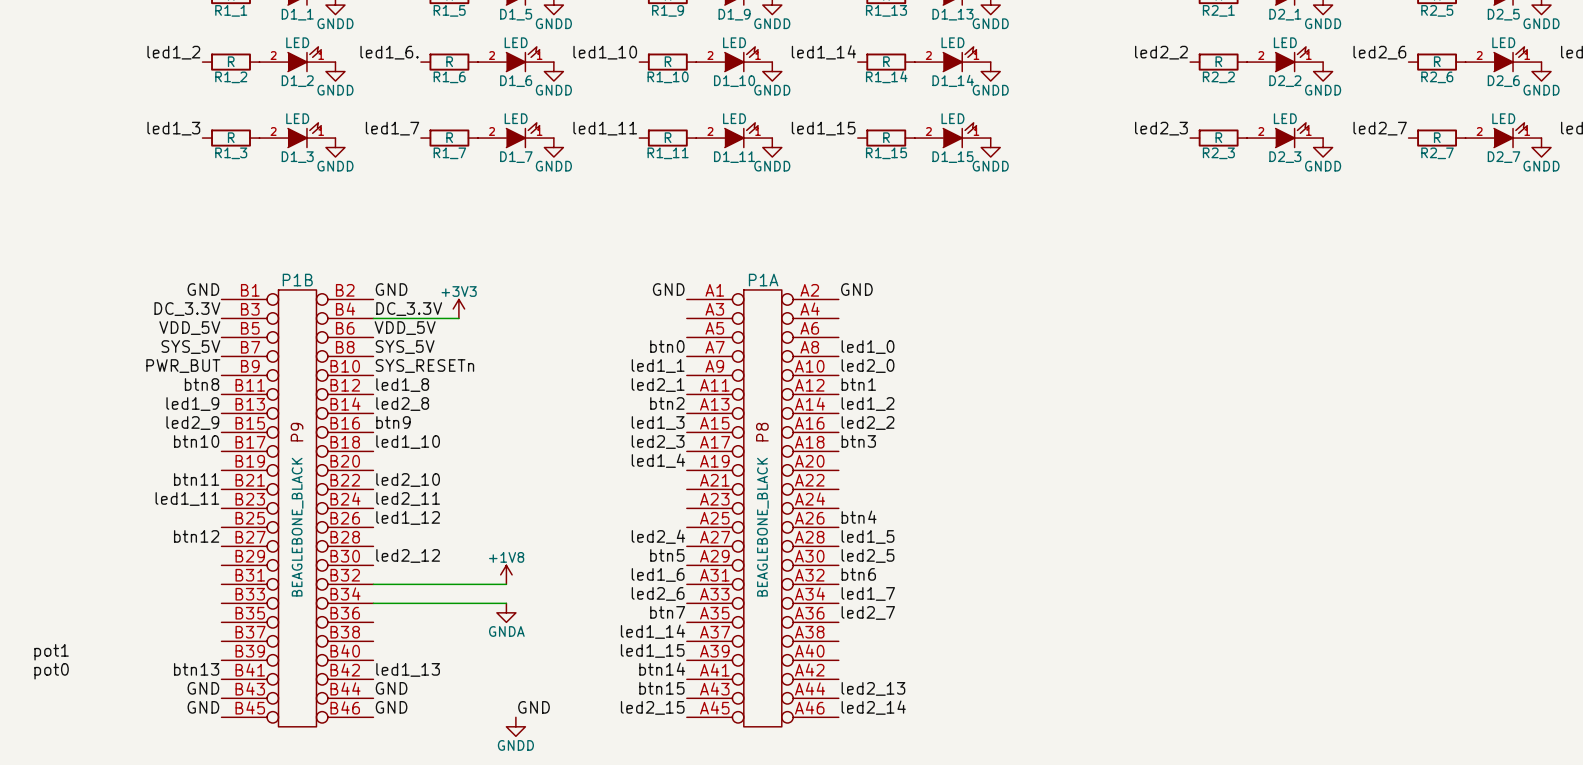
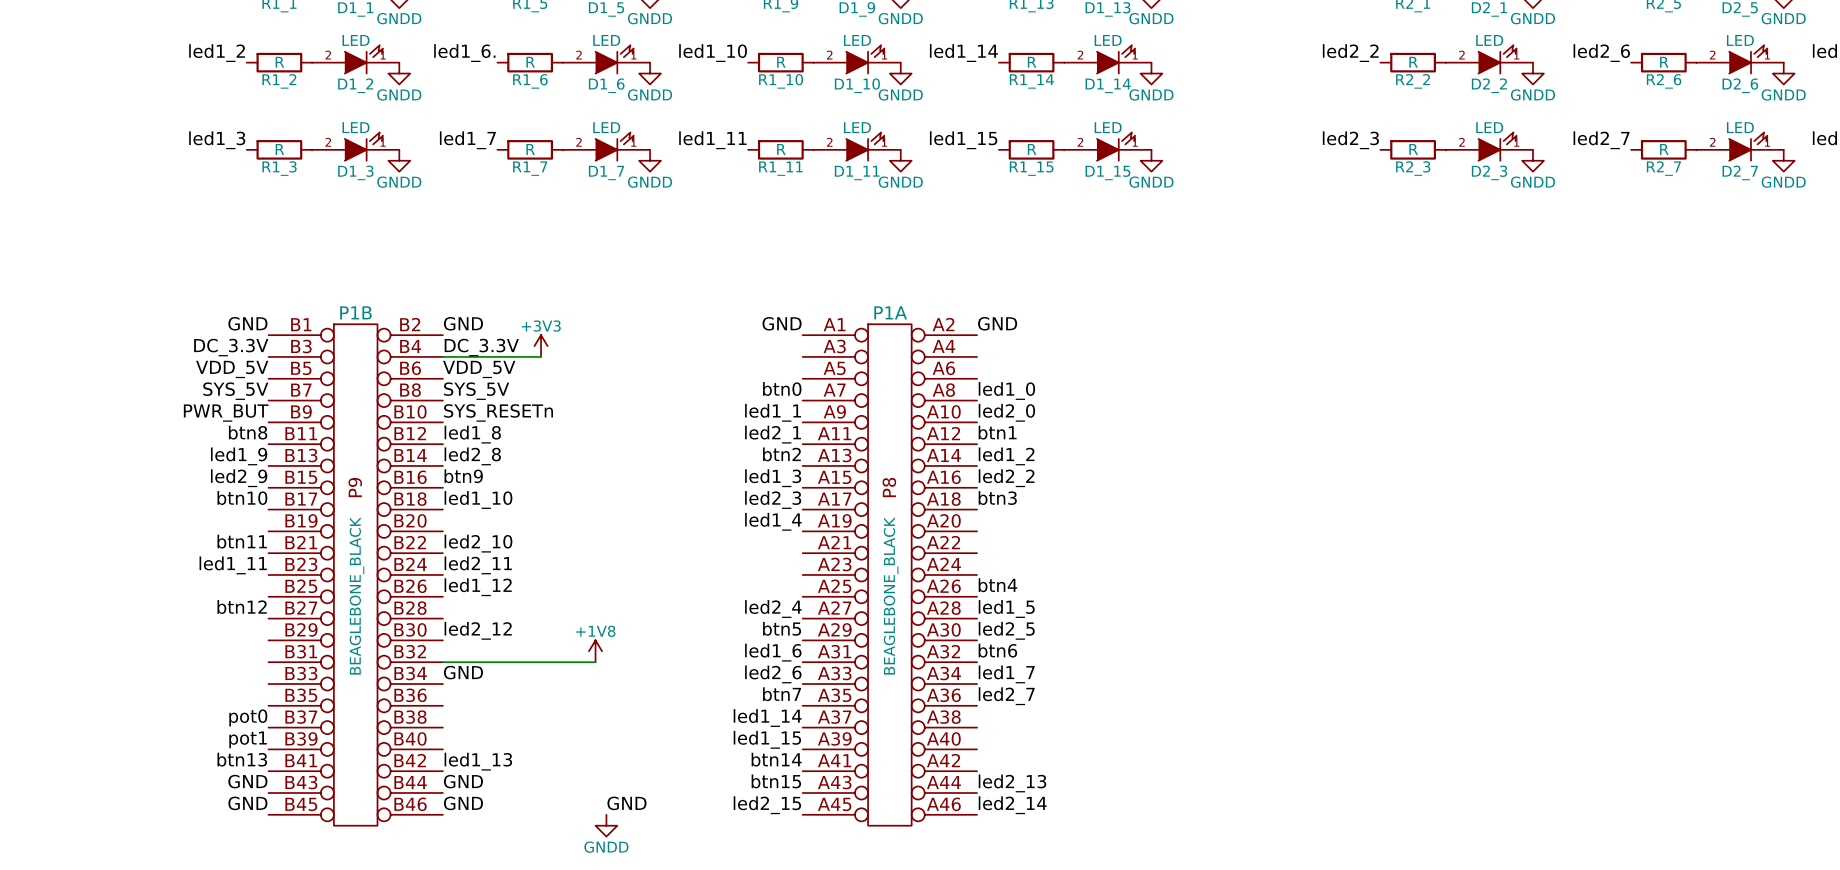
label: none -> GND (463, 672)
wire: (373, 603) (506, 603) -> none
power symbol: GNDA (506, 612) -> none
label: none -> pot0 (248, 717)
label: pot1 (51, 652) -> none
label: none -> pot1 (248, 739)
label: pot0 (51, 671) -> none

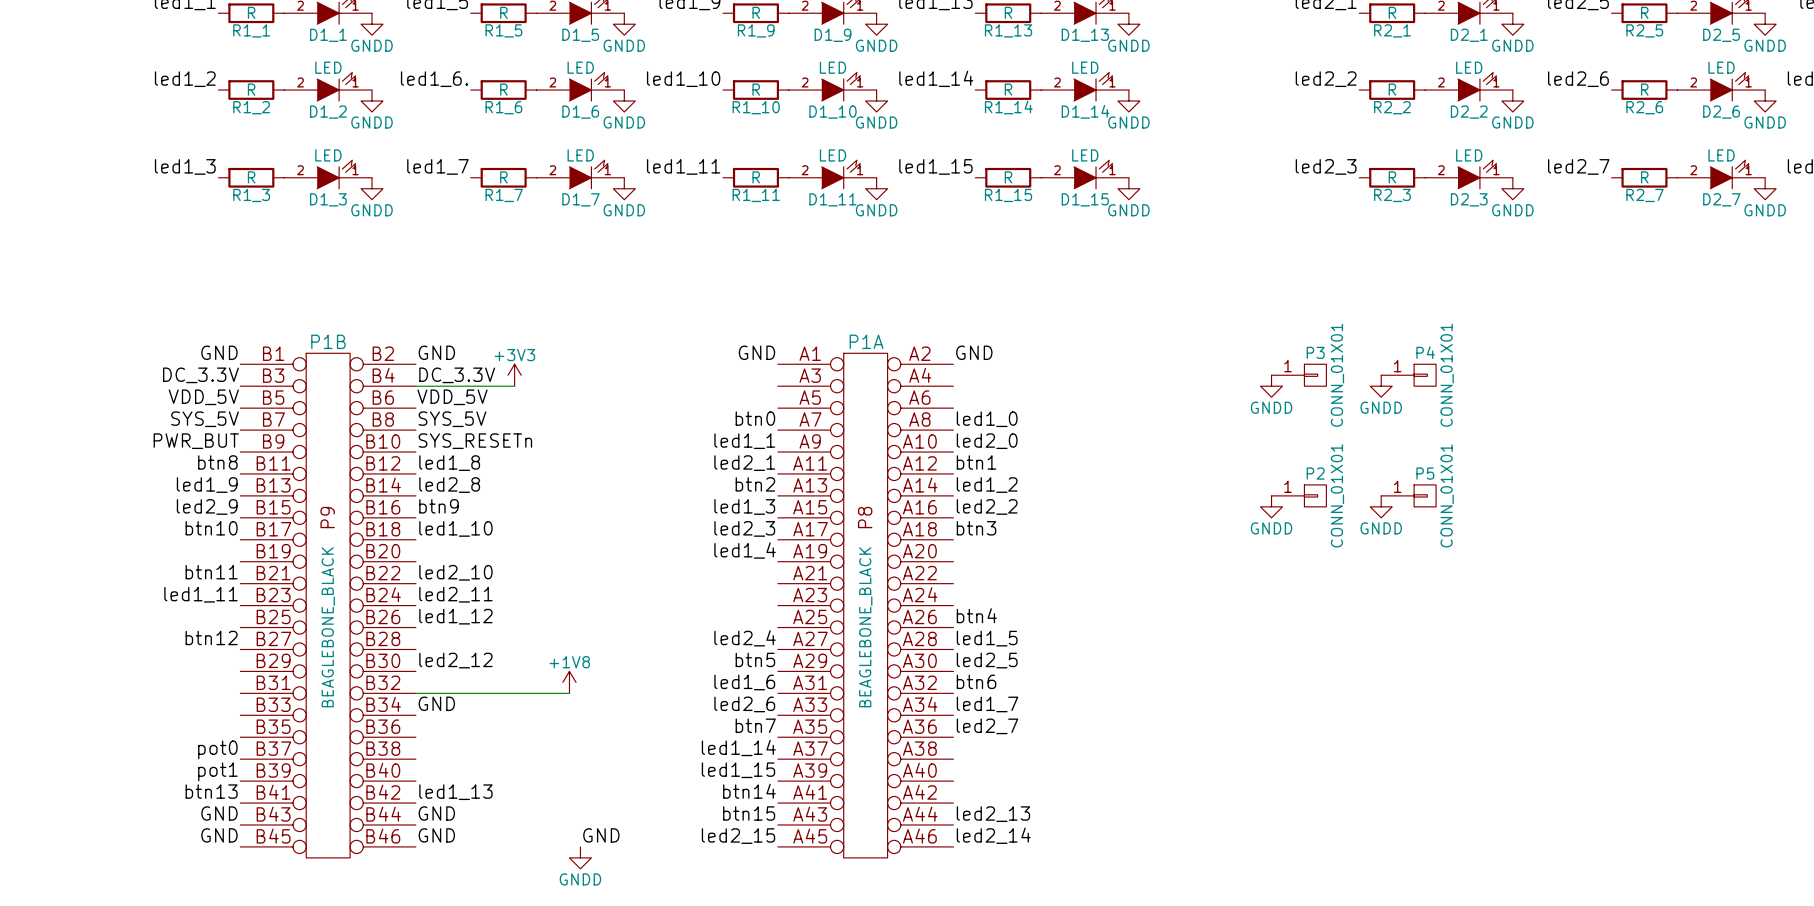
P3: none -> CONN_01X01 (1298, 375)
P4: none -> CONN_01X01 (1408, 375)
power symbol: none -> GNDD (1271, 386)
power symbol: none -> GNDD (1381, 386)
P2: none -> CONN_01X01 (1298, 495)
P5: none -> CONN_01X01 (1408, 495)
power symbol: none -> GNDD (1271, 506)
power symbol: none -> GNDD (1381, 506)

